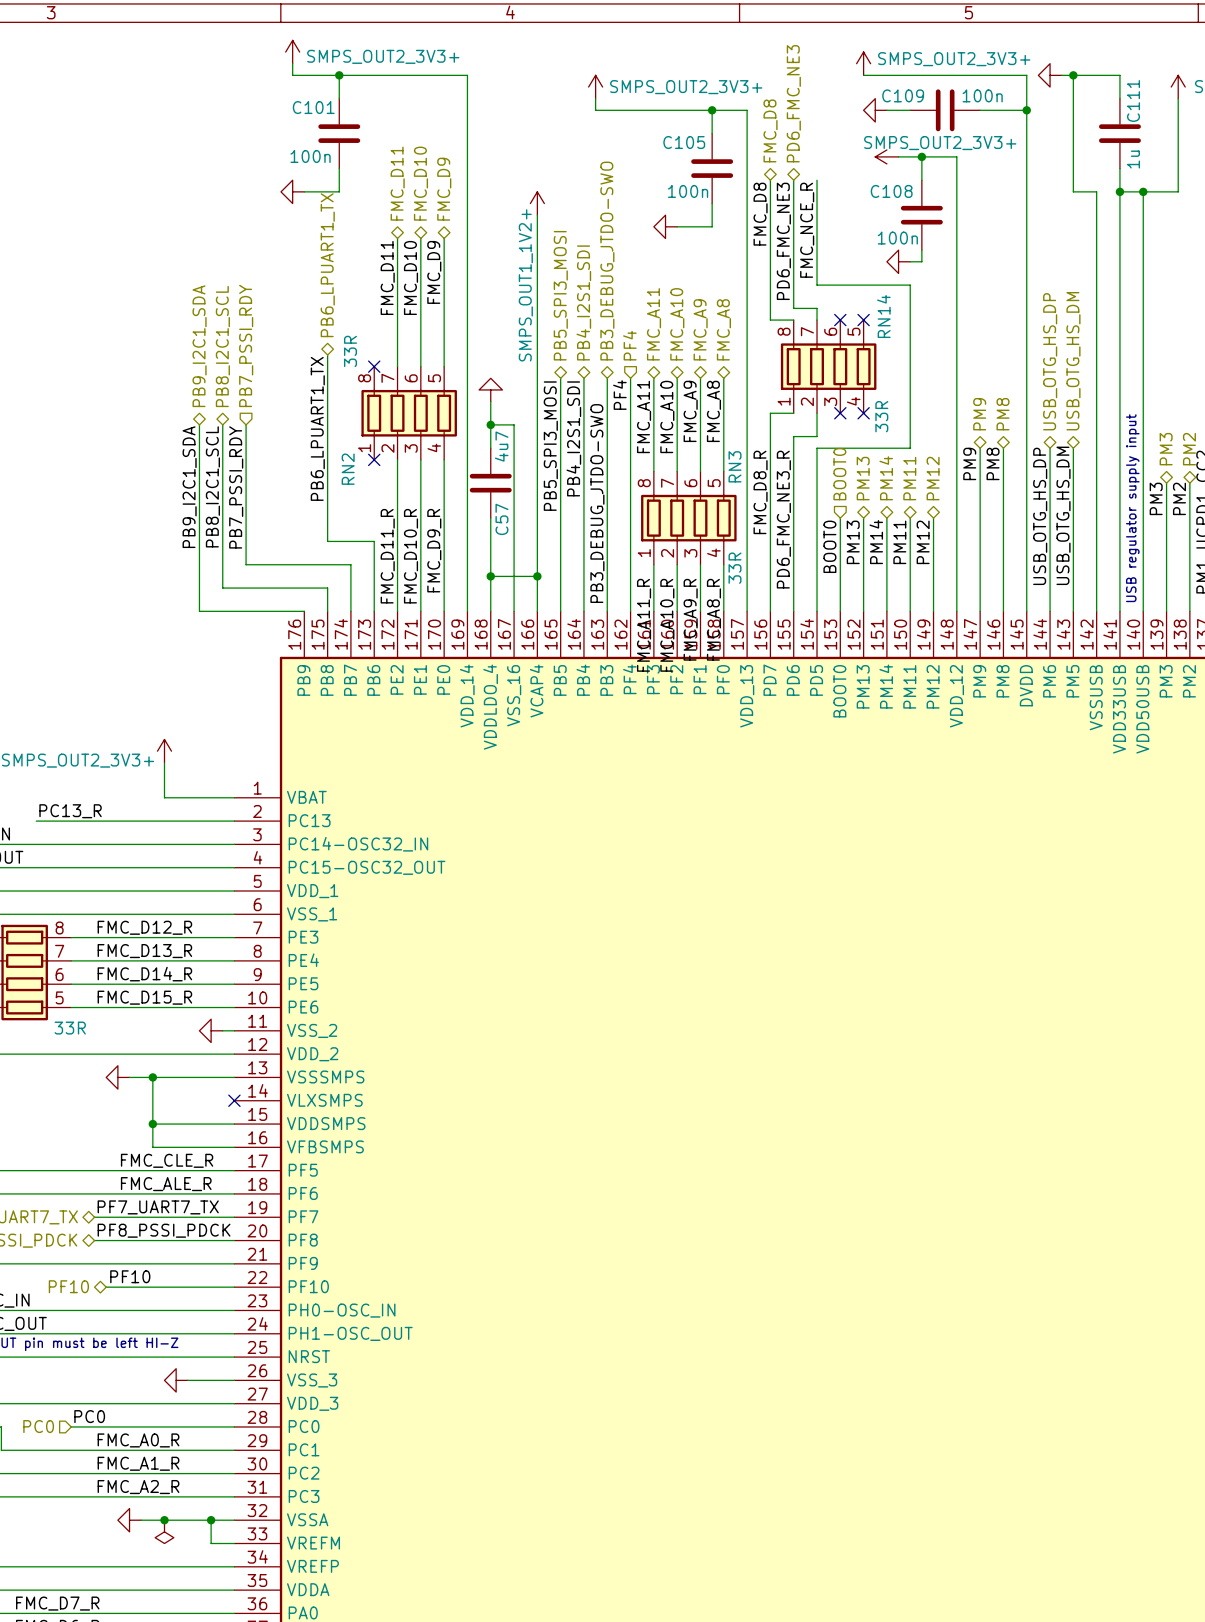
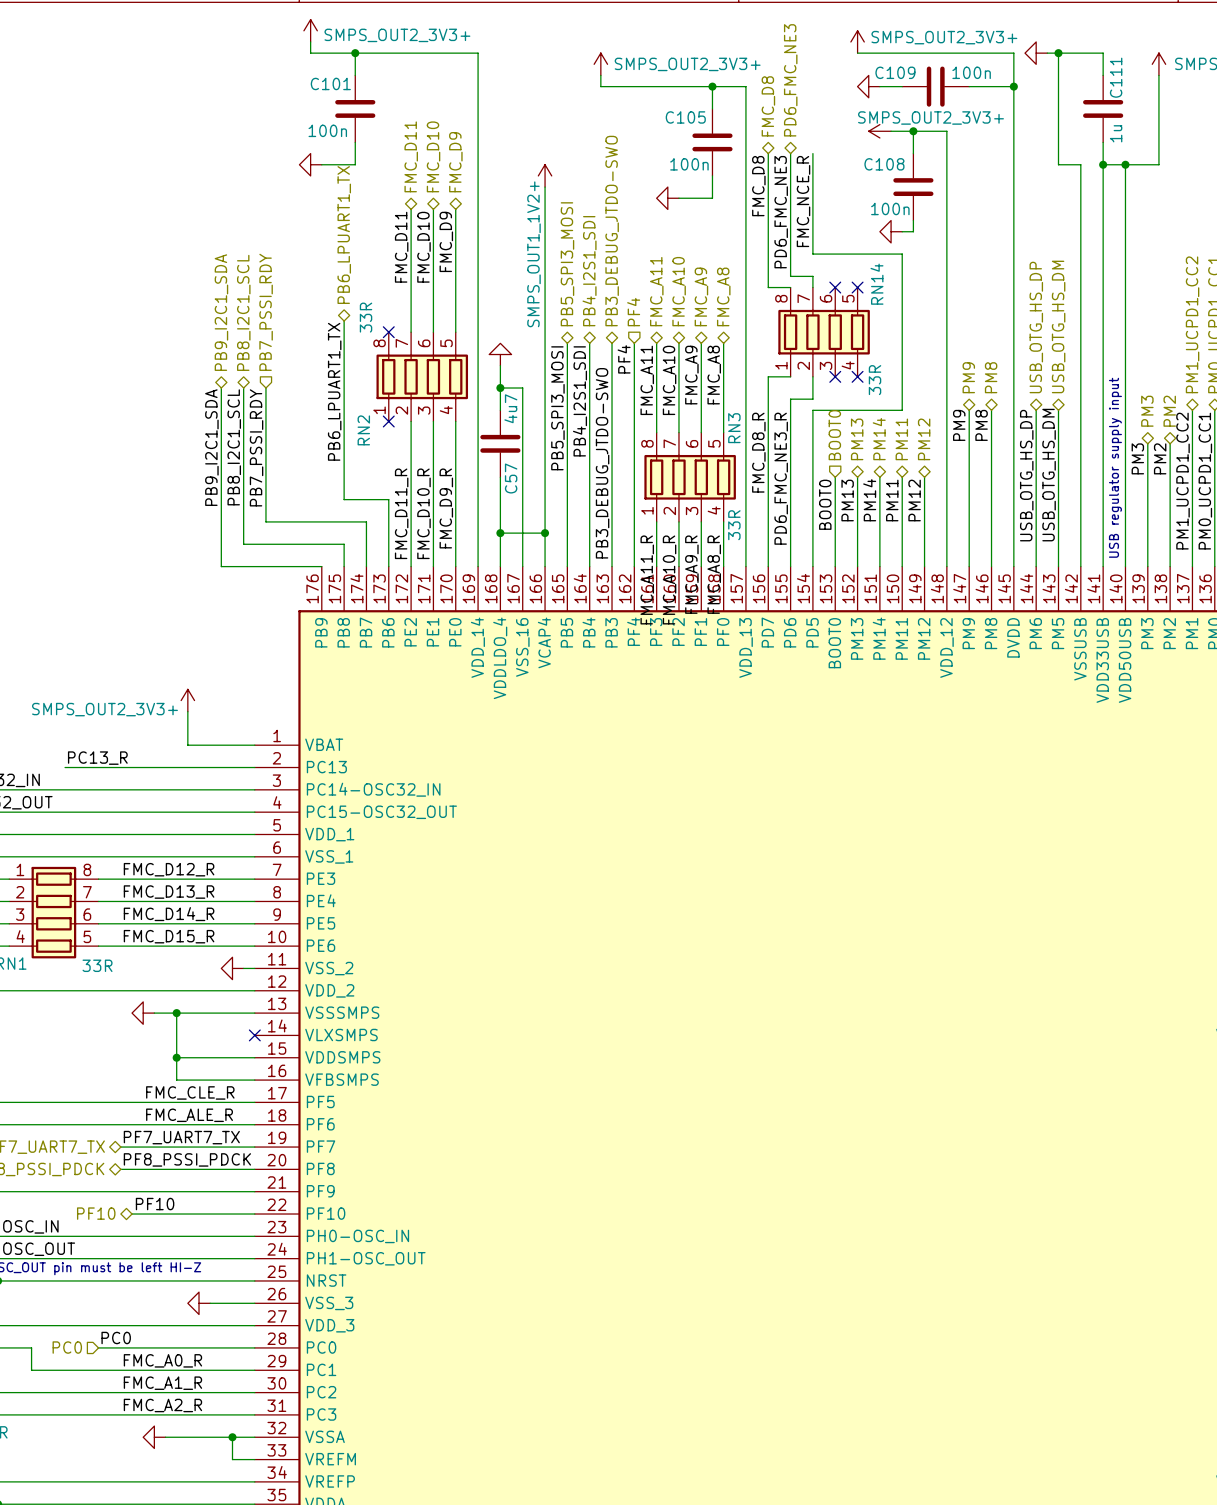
junction: (164, 1520) -> none
power symbol: (164, 1531) -> none

